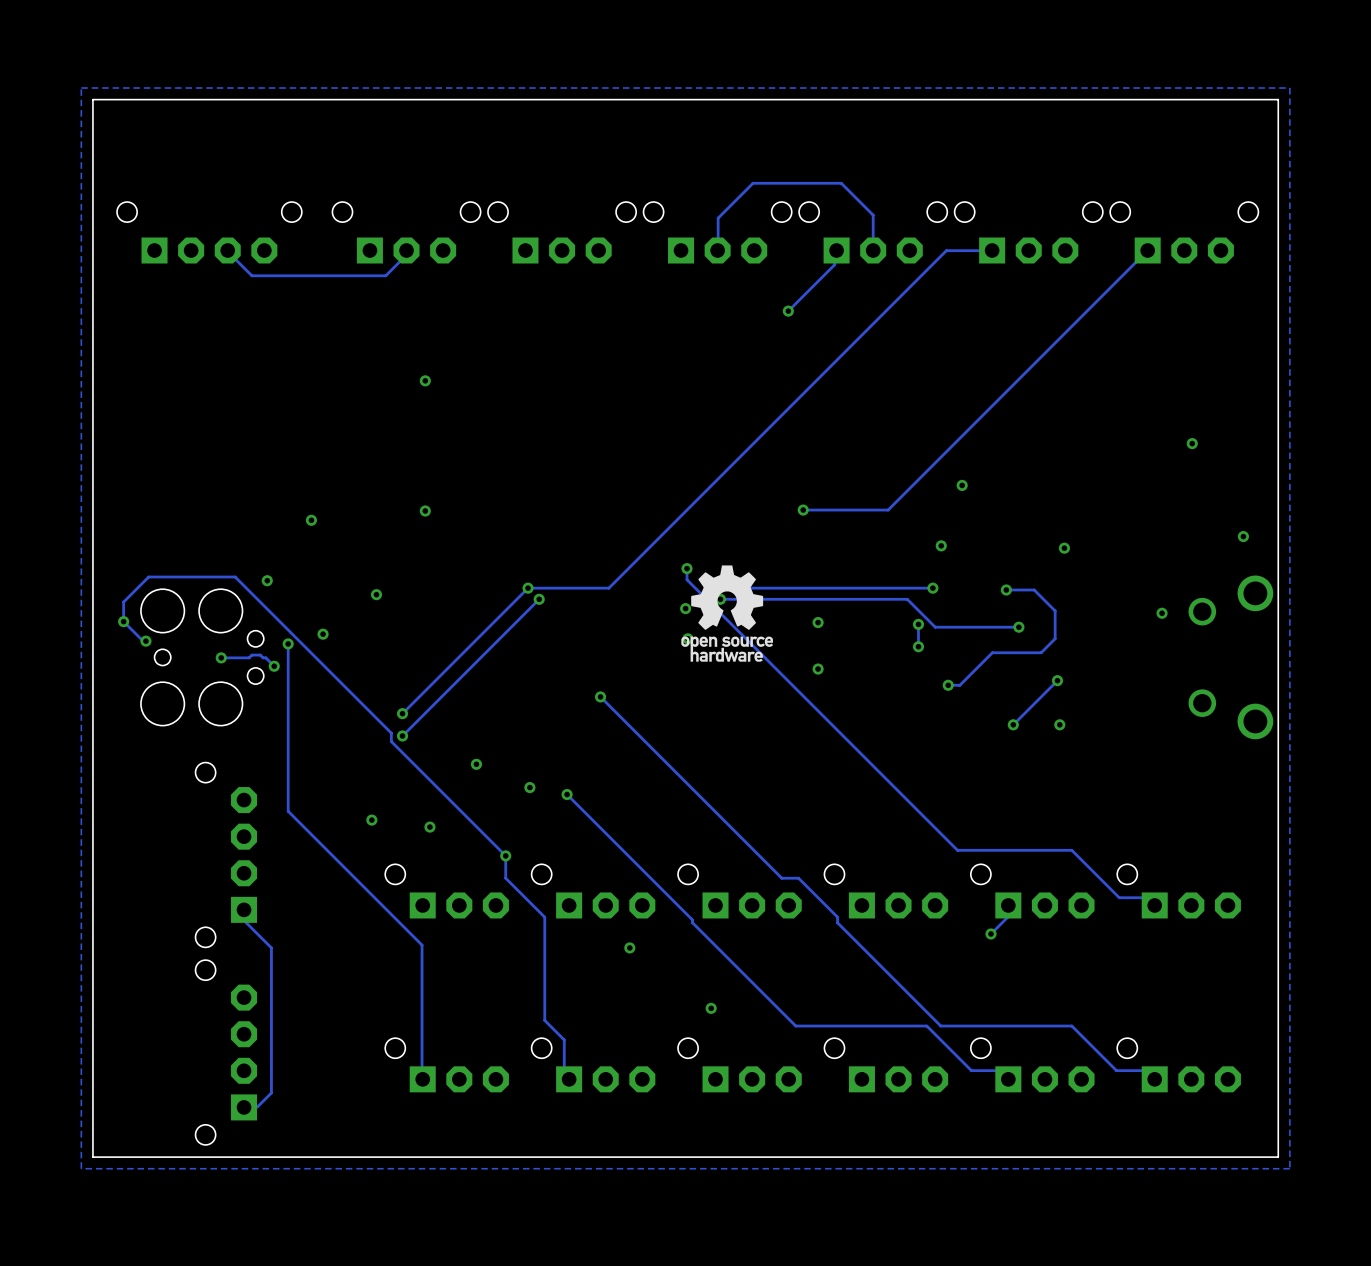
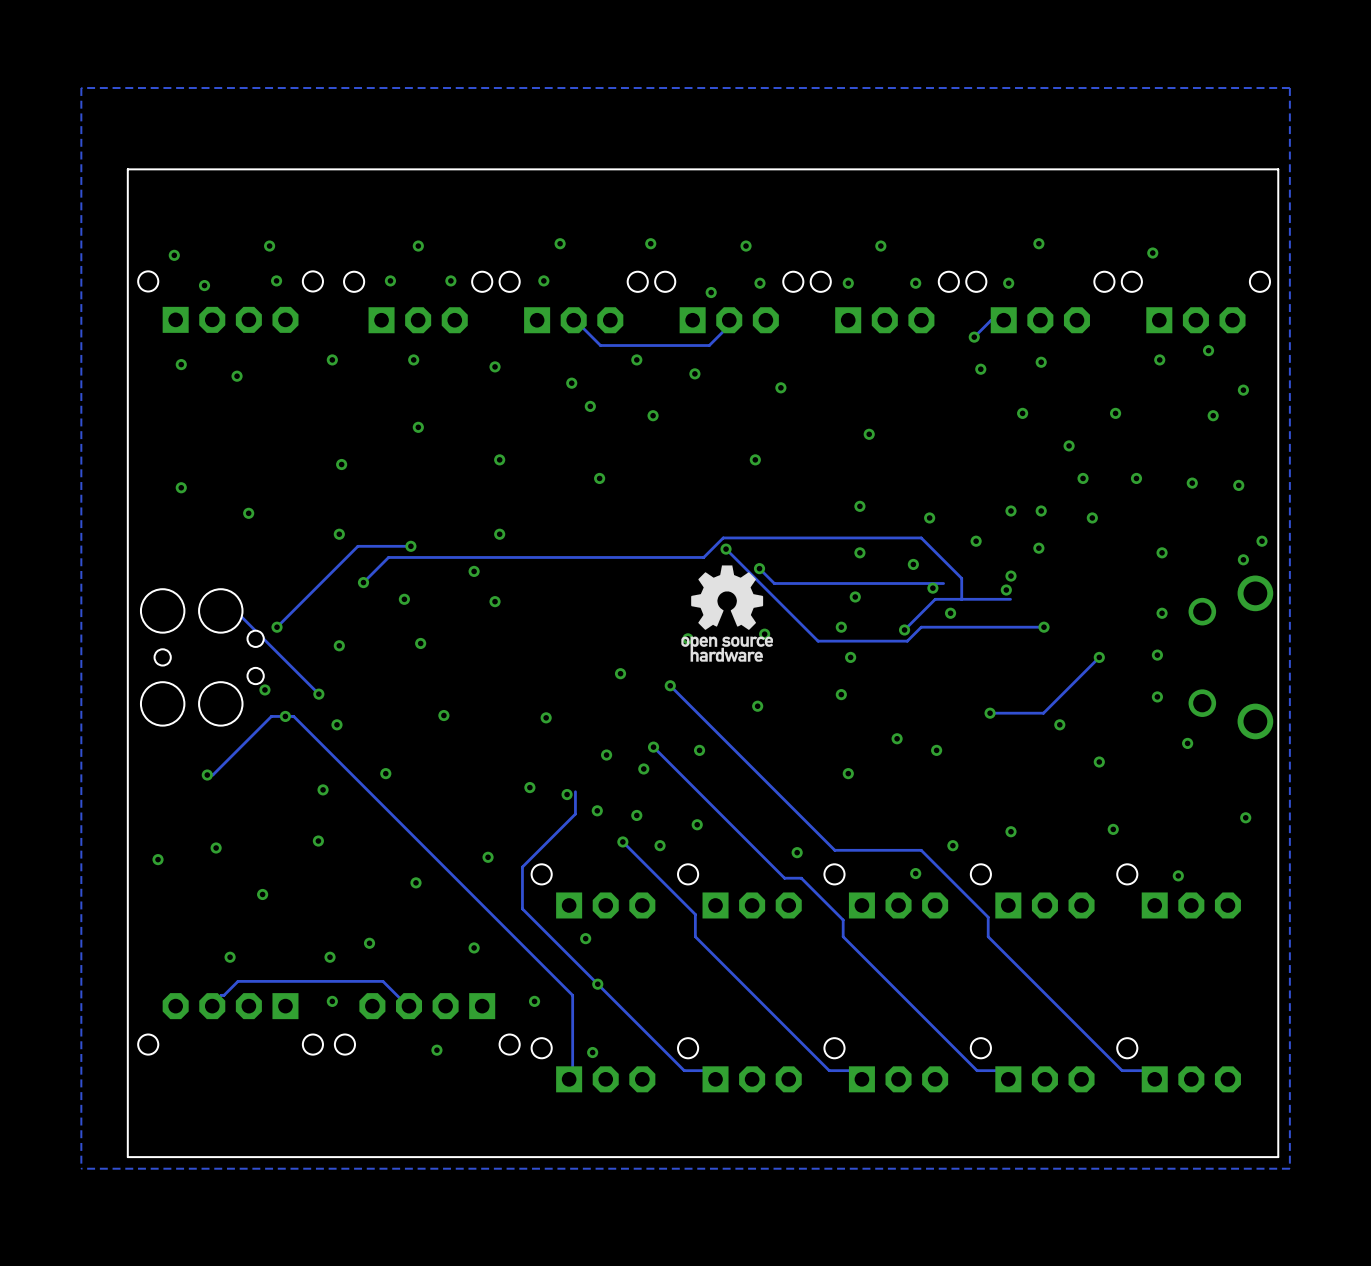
board edge: (1278, 169) (1278, 99) (92, 99) (92, 1157) (127, 1157) -> (1278, 169) (127, 169) (127, 1157)
part position: (209, 232) -> (230, 302)
part position: (406, 232) -> (418, 302)
part position: (562, 232) -> (573, 302)
part position: (717, 232) -> (729, 302)
part position: (873, 232) -> (884, 302)
part position: (1028, 232) -> (1040, 302)
part position: (1184, 232) -> (1195, 302)
via: none -> (560, 243)
via: none -> (650, 243)
via: none -> (1038, 243)
via: none -> (269, 246)
via: none -> (418, 246)
via: none -> (746, 246)
via: none -> (880, 246)
track: (406, 250) (405, 256) (385, 275) (251, 275) (227, 250) -> none
track: (836, 250) (834, 250) (834, 264) (788, 311) -> none
track: (873, 250) (873, 215) (841, 183) (753, 183) (718, 218) (717, 250) -> none
track: (992, 250) (946, 250) (608, 588) (528, 588) (402, 713) -> none
track: (1147, 250) (888, 510) (803, 510) -> none
via: none -> (1152, 253)
via: none -> (174, 255)
via: none -> (276, 280)
via: none -> (390, 280)
via: none -> (450, 280)
via: none -> (543, 280)
via: none -> (759, 283)
via: none -> (848, 283)
via: none -> (915, 283)
via: none -> (1008, 283)
via: none -> (204, 285)
via: none -> (711, 292)
via: (788, 311) -> none
track: none -> (729, 320) (728, 325) (709, 345) (600, 345) (573, 320)
track: none -> (1003, 320) (991, 320) (974, 337)
via: none -> (974, 337)
via: none -> (1208, 350)
via: none -> (332, 359)
via: none -> (413, 359)
via: none -> (636, 359)
via: none -> (1159, 359)
via: none -> (1041, 362)
via: none -> (181, 364)
via: none -> (495, 366)
via: none -> (980, 369)
via: none -> (694, 373)
via: none -> (237, 376)
via: (425, 380) -> none
via: none -> (571, 383)
via: none -> (780, 387)
via: none -> (1243, 390)
via: none -> (590, 406)
via: none -> (1022, 413)
via: none -> (1115, 413)
via: none -> (653, 415)
via: none -> (1213, 415)
via: none -> (418, 427)
via: none -> (869, 434)
via: (1192, 443) -> none
via: none -> (1069, 445)
via: none -> (499, 459)
via: none -> (755, 459)
via: none -> (341, 464)
via: none -> (599, 478)
via: none -> (1083, 478)
via: none -> (1136, 478)
via: none -> (1192, 483)
via: (962, 485) -> none
via: none -> (1238, 485)
via: none -> (181, 487)
via: none -> (859, 506)
via: (425, 510) -> none
via: (803, 510) -> none
via: none -> (1010, 510)
via: none -> (1041, 510)
via: none -> (248, 513)
via: none -> (929, 517)
via: none -> (1092, 517)
via position: (311, 520) -> (339, 534)
via: none -> (499, 534)
via: (1243, 536) -> none
via: none -> (976, 541)
via: none -> (1261, 541)
via: (941, 545) -> none
track: none -> (410, 546) (357, 546) (277, 627)
via: none -> (410, 546)
via: none -> (1038, 548)
via: (1064, 548) -> none
via: none -> (726, 549)
via: none -> (859, 552)
via: none -> (1162, 552)
via: none -> (1243, 559)
via: none -> (913, 564)
track: (687, 568) (687, 579) (957, 850) (1071, 850) (1119, 897) (1147, 897) (1154, 905) -> none
via: (687, 568) -> none
track: none -> (759, 568) (774, 583) (943, 583)
via: none -> (759, 568)
via: none -> (474, 571)
via: none -> (1010, 576)
track: (731, 579) (739, 588) (932, 588) -> none
via: (267, 580) -> none
track: none -> (363, 582) (388, 557) (703, 557) (723, 537) (921, 537) (961, 578) (961, 599)
via: none -> (363, 582)
via: (528, 588) -> none
track: (1006, 590) (1034, 590) (1055, 610) (1055, 638) (1041, 652) (992, 652) (959, 685) (948, 685) -> none
via: (376, 594) -> none
via: none -> (855, 596)
via: none -> (404, 599)
track: (539, 599) (402, 735) -> none
via: (539, 599) -> none
track: (720, 599) (907, 599) (935, 627) -> (726, 549) (818, 641) (907, 641) (921, 627) (935, 627)
via: (720, 599) -> none
track: none -> (1010, 599) (935, 599) (904, 629)
via: none -> (495, 601)
via: (685, 608) -> none
track: none -> (235, 610) (318, 694)
via: none -> (950, 613)
via: (123, 621) -> none
via: (818, 622) -> none
track: (918, 624) (918, 646) -> none
via: (918, 624) -> none
via: none -> (277, 627)
via: none -> (841, 627)
via position: (1018, 627) -> (1043, 627)
track: none -> (1043, 627) (1018, 627)
via: none -> (904, 629)
via position: (323, 634) -> (339, 645)
via: none -> (764, 634)
track: (145, 641) (143, 641) (123, 621) (123, 602) (148, 577) (235, 577) (391, 733) (391, 741) (505, 855) (505, 878) (544, 917) (544, 1020) (564, 1039) (564, 1076) (569, 1079) -> none
via: (145, 641) -> none
track: (288, 643) (288, 811) (422, 945) (422, 1079) -> none
via: (288, 643) -> none
via: none -> (420, 643)
via: (918, 646) -> none
via: none -> (1157, 655)
track: (221, 657) (249, 657) (251, 655) (260, 655) (274, 666) -> none
via: (221, 657) -> none
via: none -> (850, 657)
track: none -> (1099, 657) (1043, 713) (990, 713)
via: none -> (1099, 657)
via: (274, 666) -> none
via: (818, 669) -> none
via: none -> (620, 673)
track: (1057, 680) (1013, 724) -> none
via: (1057, 680) -> none
track: none -> (670, 685) (834, 850) (921, 850) (988, 917) (988, 936) (1122, 1070)
via: none -> (670, 685)
via: (948, 685) -> none
via: none -> (264, 689)
via: none -> (318, 694)
via: none -> (841, 694)
track: (600, 696) (781, 878) (784, 878) -> (653, 747) (784, 878)
via: (600, 696) -> none
via: none -> (1157, 696)
via: none -> (757, 706)
via: (402, 713) -> none
via: none -> (990, 713)
via: none -> (443, 715)
via: none -> (285, 716)
via: none -> (546, 717)
via: none -> (336, 724)
via: (1013, 724) -> none
via: (402, 735) -> none
via: none -> (897, 738)
via: none -> (1187, 743)
via: none -> (653, 747)
via: none -> (699, 750)
via: none -> (936, 750)
via: none -> (606, 755)
via: none -> (1099, 762)
via: (476, 764) -> none
via: none -> (643, 768)
via: none -> (385, 773)
via: none -> (848, 773)
track: none -> (207, 775) (212, 775) (271, 716) (293, 716) (572, 995) (573, 1079)
via: none -> (207, 775)
via: none -> (323, 789)
track: none -> (575, 791) (575, 814) (522, 867) (522, 908) (684, 1070) (709, 1070) (720, 1079)
track: (567, 794) (795, 1026) (926, 1026) (971, 1070) (977, 1070) -> none
via: none -> (597, 810)
via: none -> (636, 815)
via: none -> (1245, 817)
via: (371, 820) -> none
via: none -> (697, 824)
via: (429, 827) -> none
via: none -> (1113, 829)
via: none -> (1010, 831)
via: none -> (318, 841)
track: none -> (622, 841) (695, 914) (695, 936) (829, 1070) (857, 1070) (866, 1079)
via: none -> (622, 841)
via: none -> (660, 845)
via: none -> (952, 845)
via: none -> (216, 847)
via: none -> (797, 852)
part: (226, 854) -> none
via position: (505, 855) -> (488, 857)
via: none -> (158, 859)
via: none -> (915, 873)
via: none -> (1178, 875)
track: (798, 878) (837, 917) (837, 922) (940, 1026) (1071, 1026) (1116, 1070) (1122, 1070) -> (798, 878) (801, 878) (843, 920) (843, 936) (977, 1070)
via: none -> (416, 882)
part: (447, 891) -> none
via: none -> (262, 894)
track: (1008, 905) (1007, 917) (991, 933) -> none
track: (244, 909) (246, 911) (246, 922) (271, 947) (271, 1092) (257, 1106) (244, 1107) -> none
via: (991, 933) -> none
via: none -> (585, 938)
via: none -> (369, 943)
via: none -> (474, 947)
via: (629, 947) -> none
via: none -> (230, 957)
via: none -> (330, 957)
via: none -> (597, 984)
via: none -> (332, 1001)
via: none -> (534, 1001)
track: none -> (409, 1006) (383, 981) (237, 981) (224, 995) (221, 995) (212, 1006)
via: (711, 1008) -> none
part: none -> (427, 1023)
via: none -> (436, 1050)
part rotation: 0° (226, 1052) -> 90° counterclockwise (230, 1023)
via: none -> (592, 1052)
part: (447, 1065) -> none

